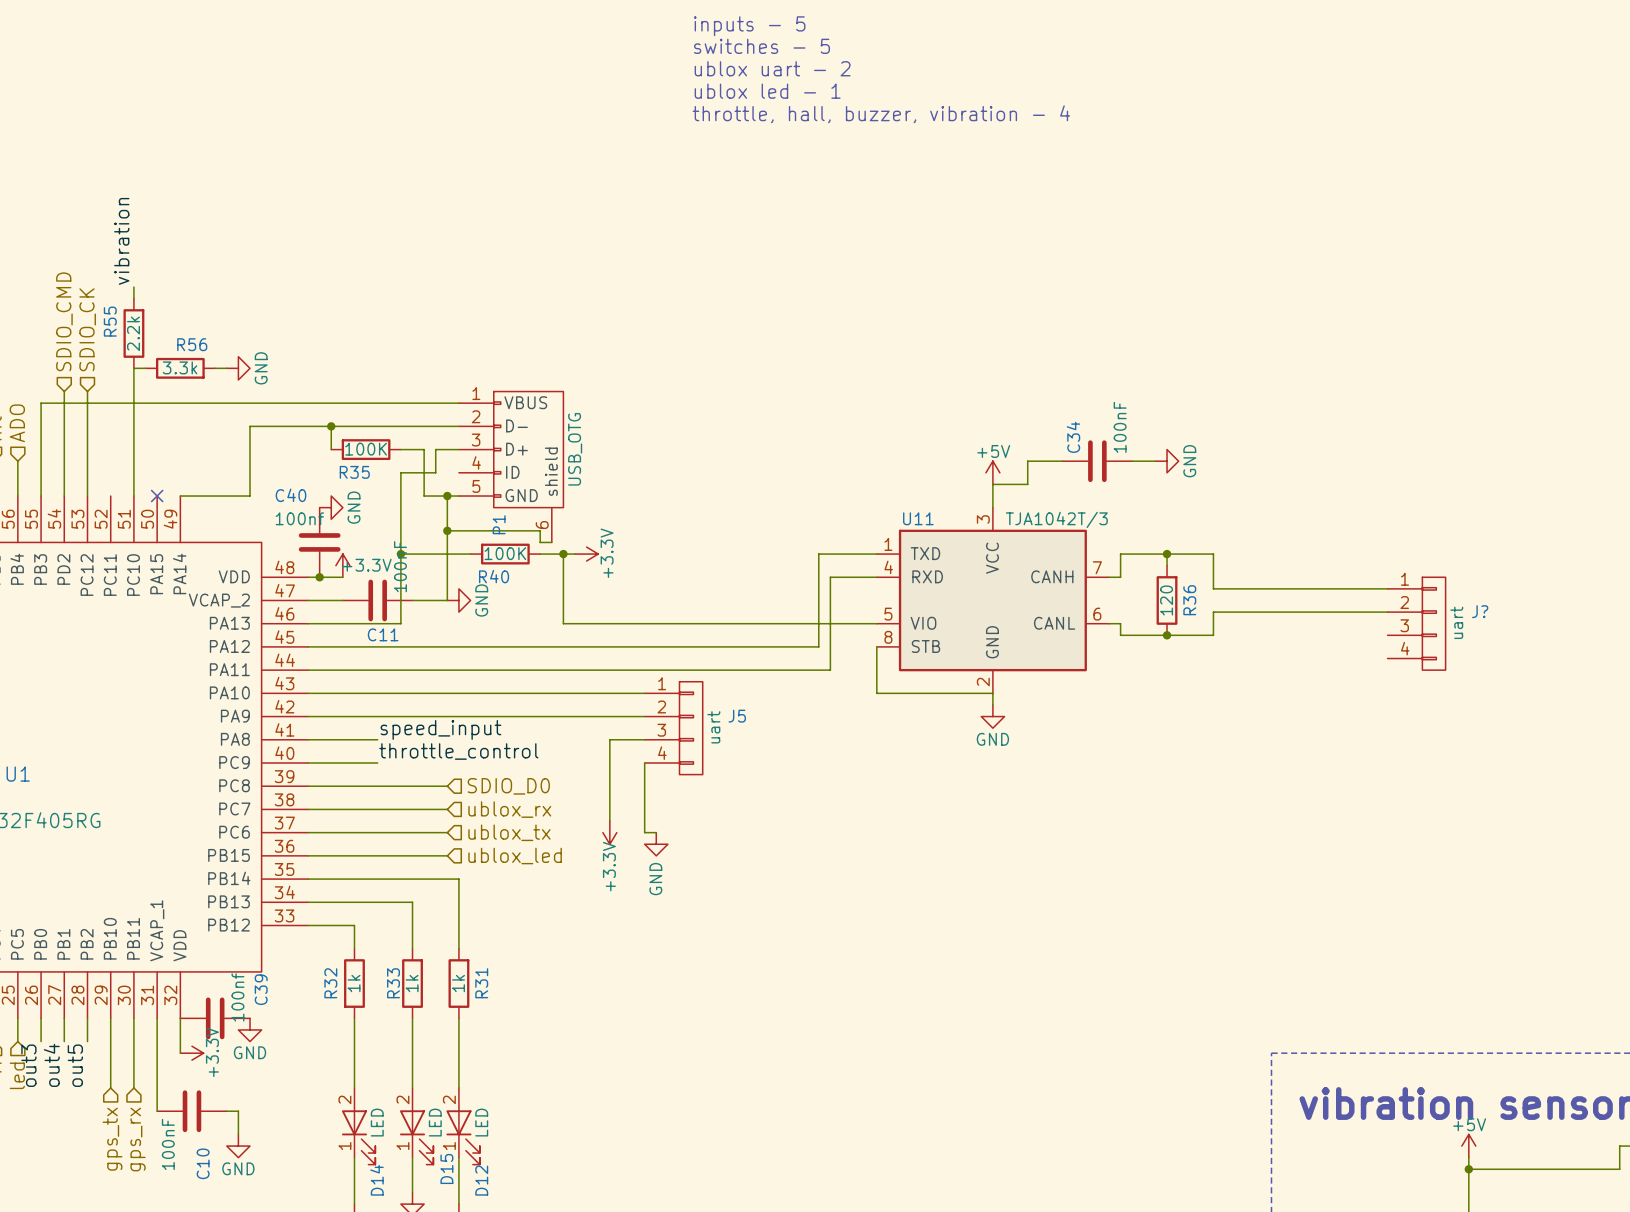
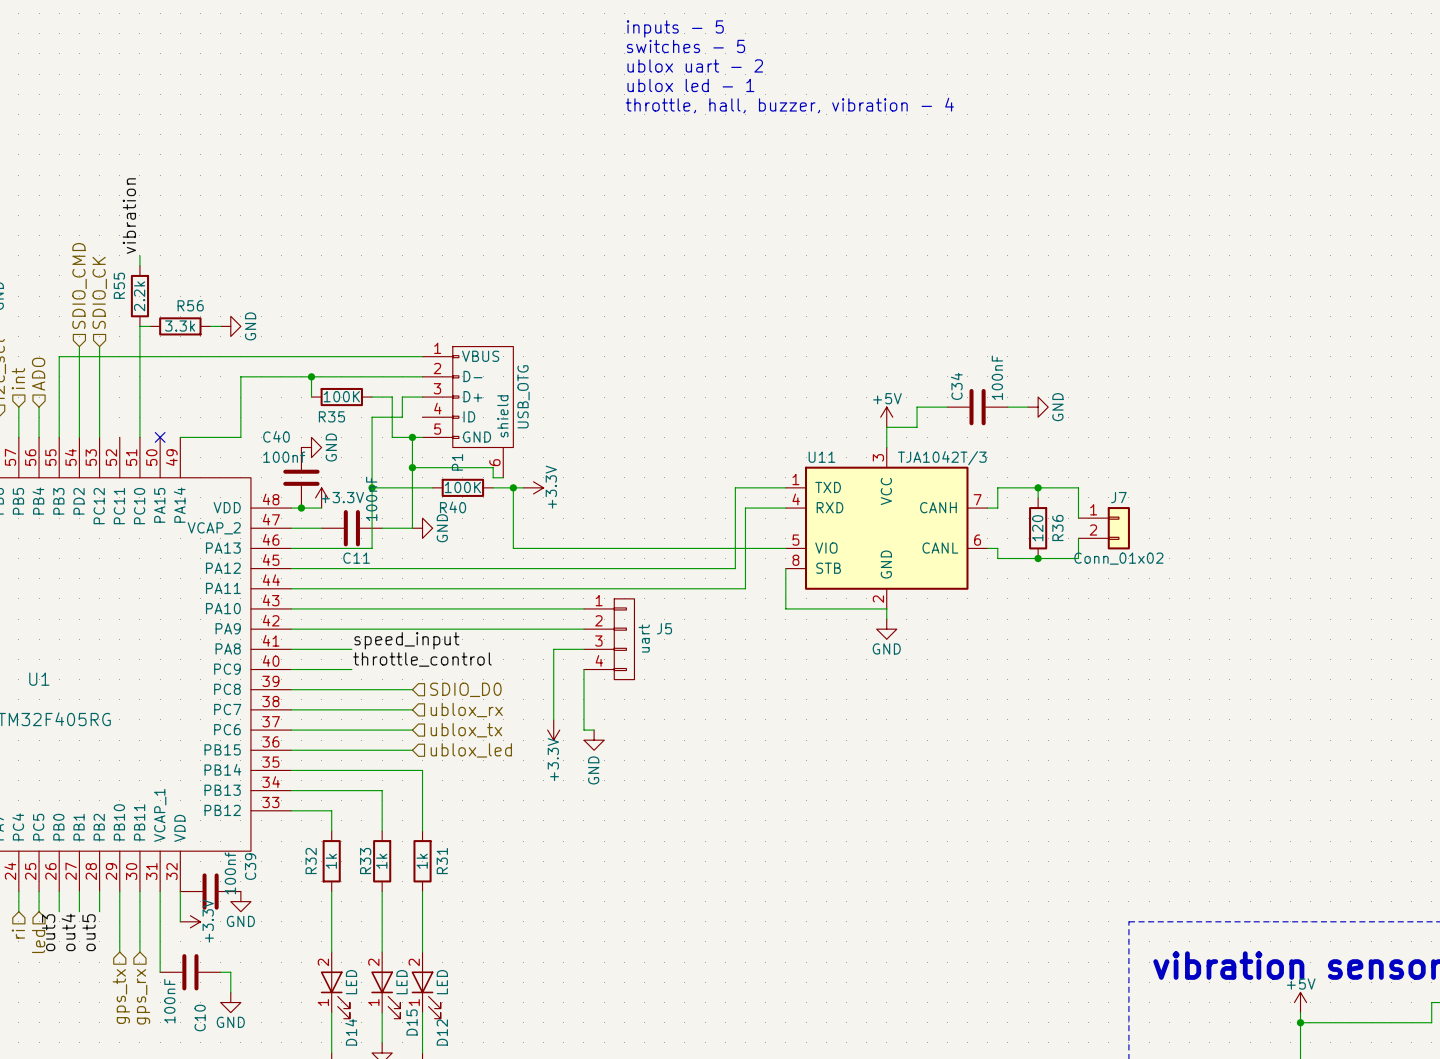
wire: (1213, 588) (1387, 588) -> none
J7: none -> Conn_01x02 (1104, 528)
wire: (1213, 612) (1387, 612) -> none
J?: uart (1416, 623) -> none

